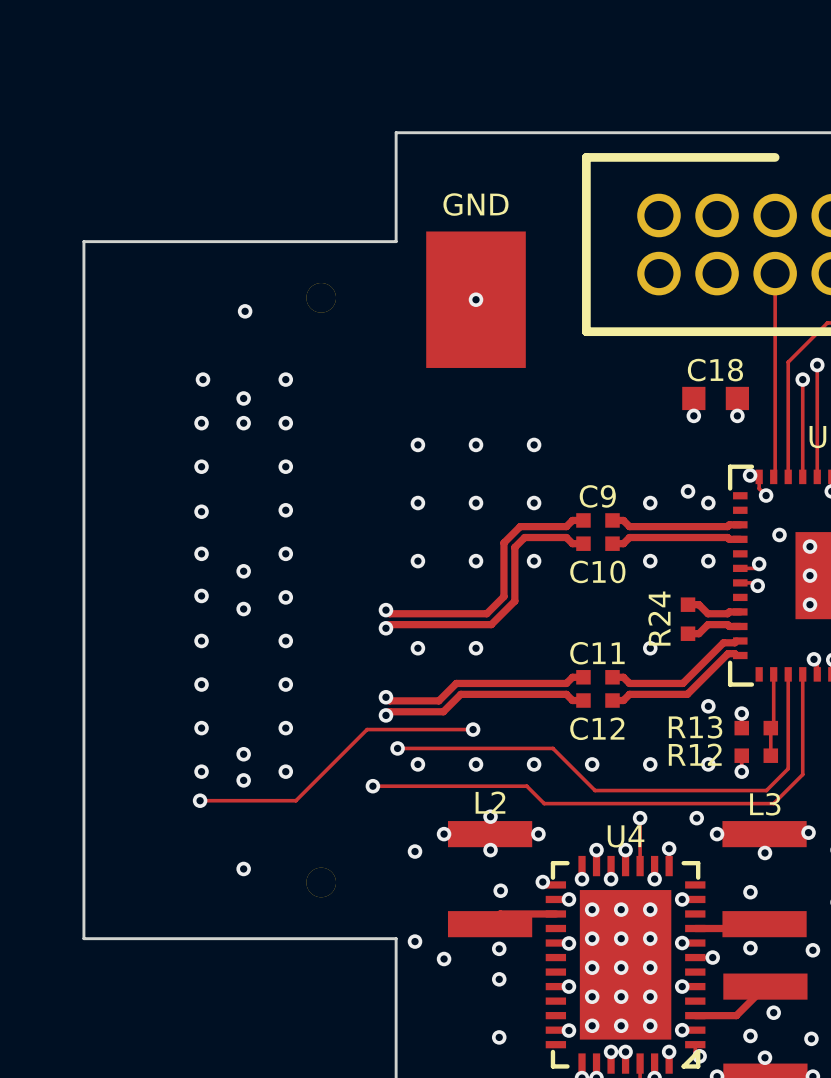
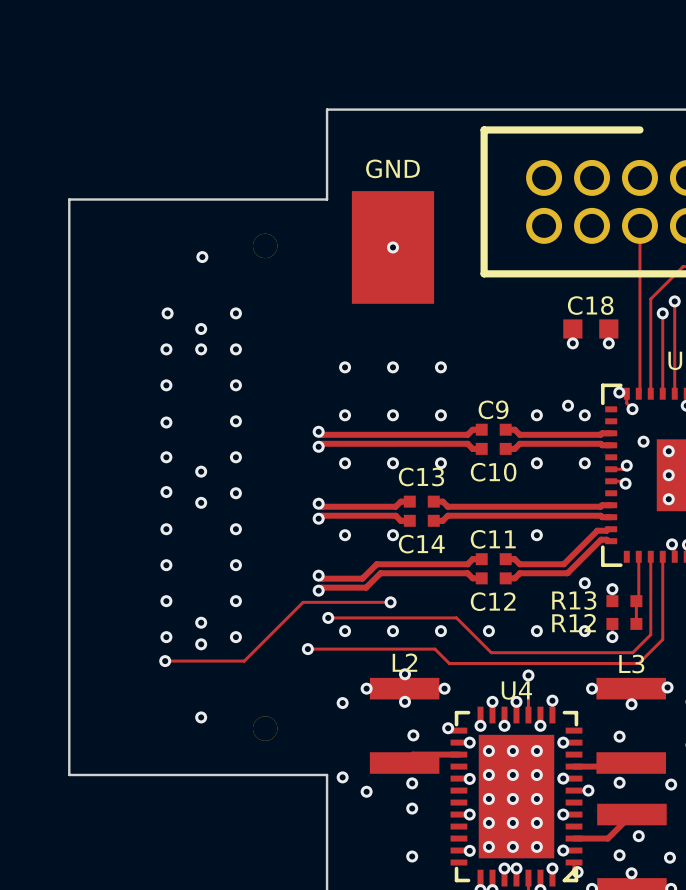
track: none -> (318, 431) (321, 434) (429, 434)
via: none -> (318, 431)
track: (520, 526) (503, 542) (503, 596) (486, 613) (479, 613) -> (409, 501) (400, 501) (395, 506)
track: (524, 537) (514, 547) (514, 601) (491, 624) (479, 624) -> (409, 520) (400, 520) (395, 515)
track: none -> (433, 443) (321, 443) (318, 446)
via: none -> (318, 446)
track: (688, 604) (698, 604) (707, 613) -> (433, 501) (442, 501) (447, 506) (584, 506)
C13: none -> (421, 501)
R24: (688, 619) -> none
track: (707, 624) (698, 633) (688, 633) -> (584, 515) (447, 515) (442, 520) (433, 520)
C14: none -> (421, 520)
via: (696, 818) -> none

